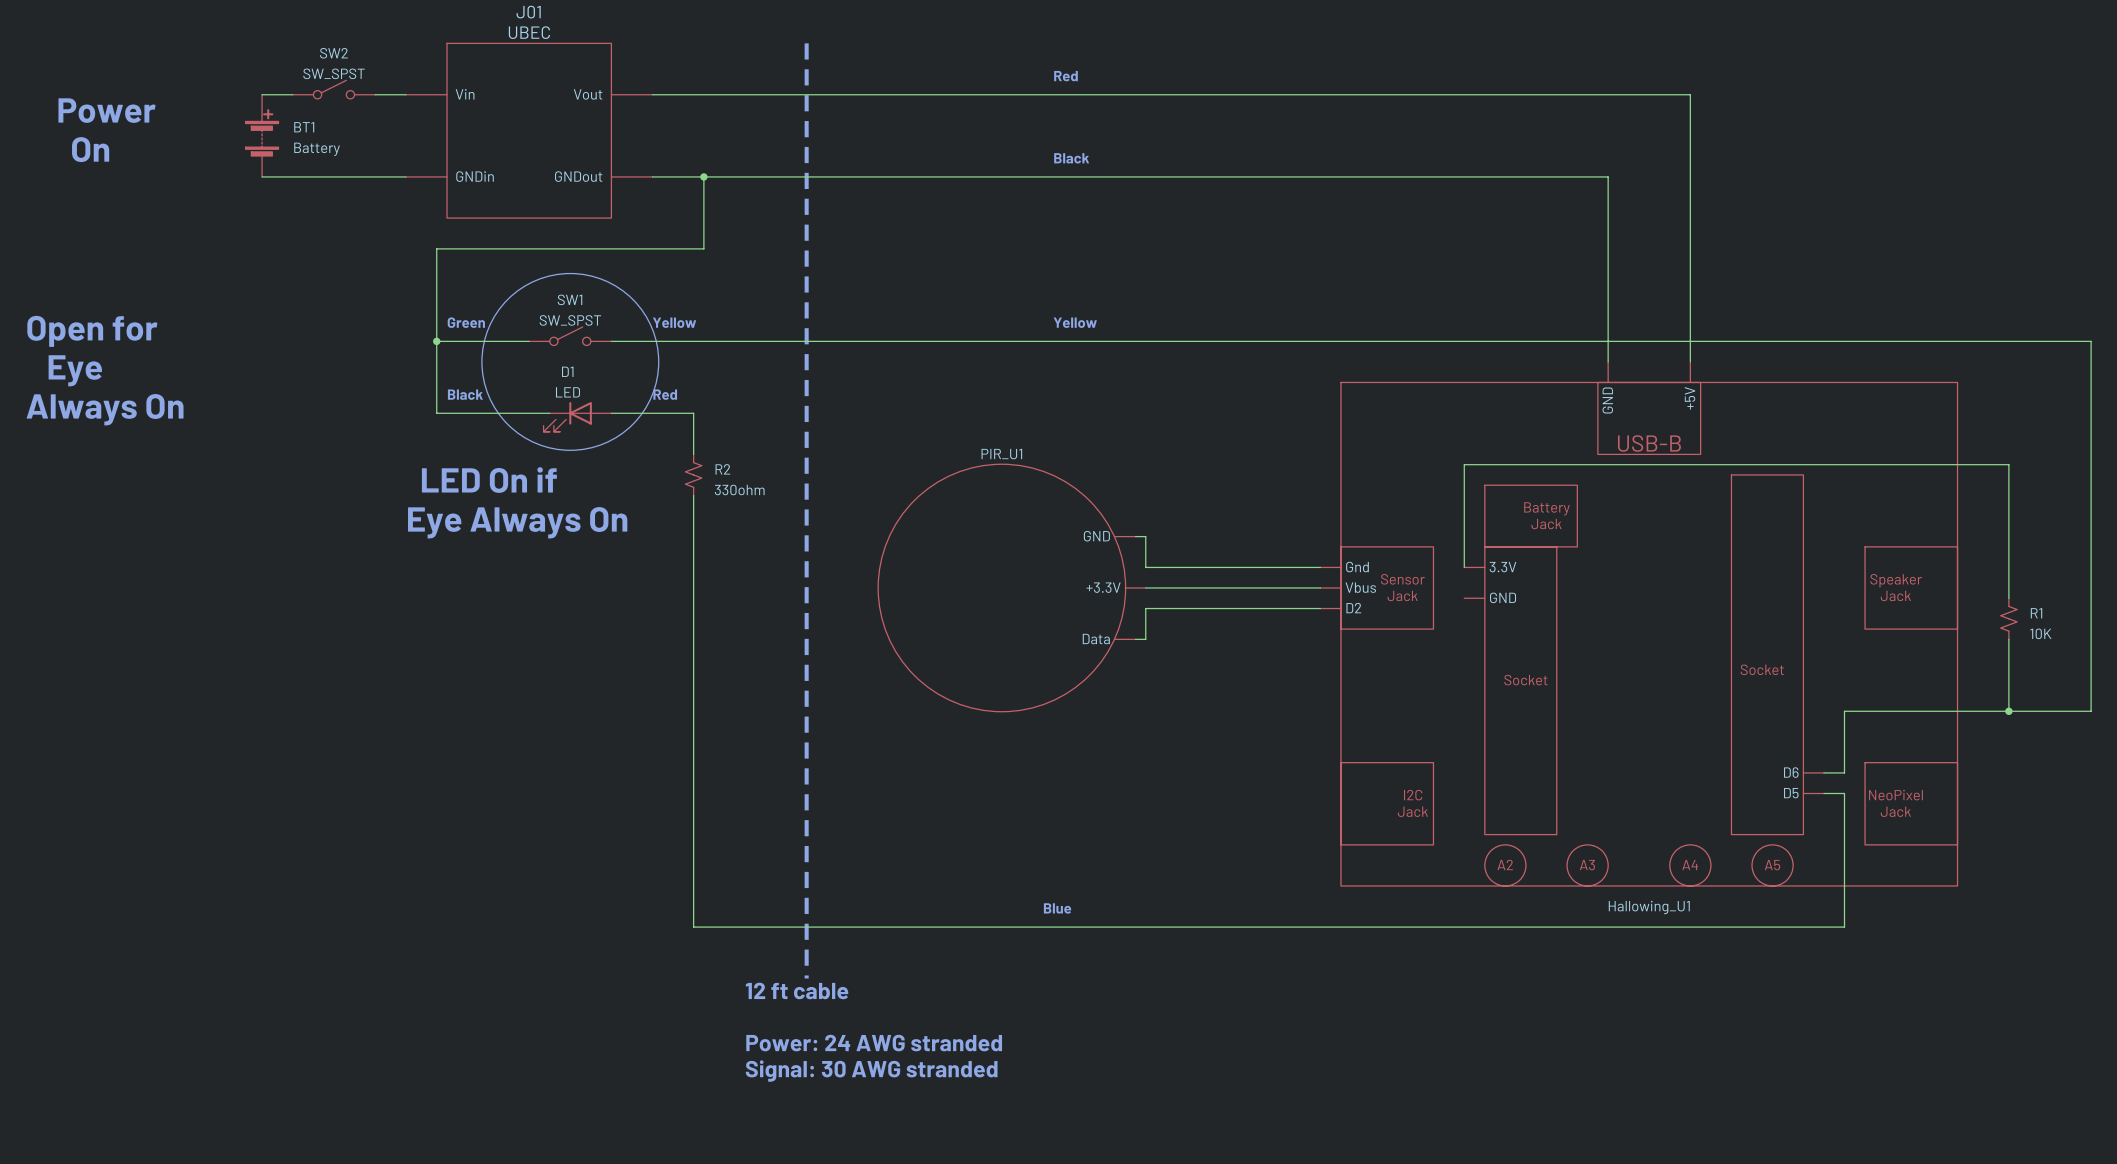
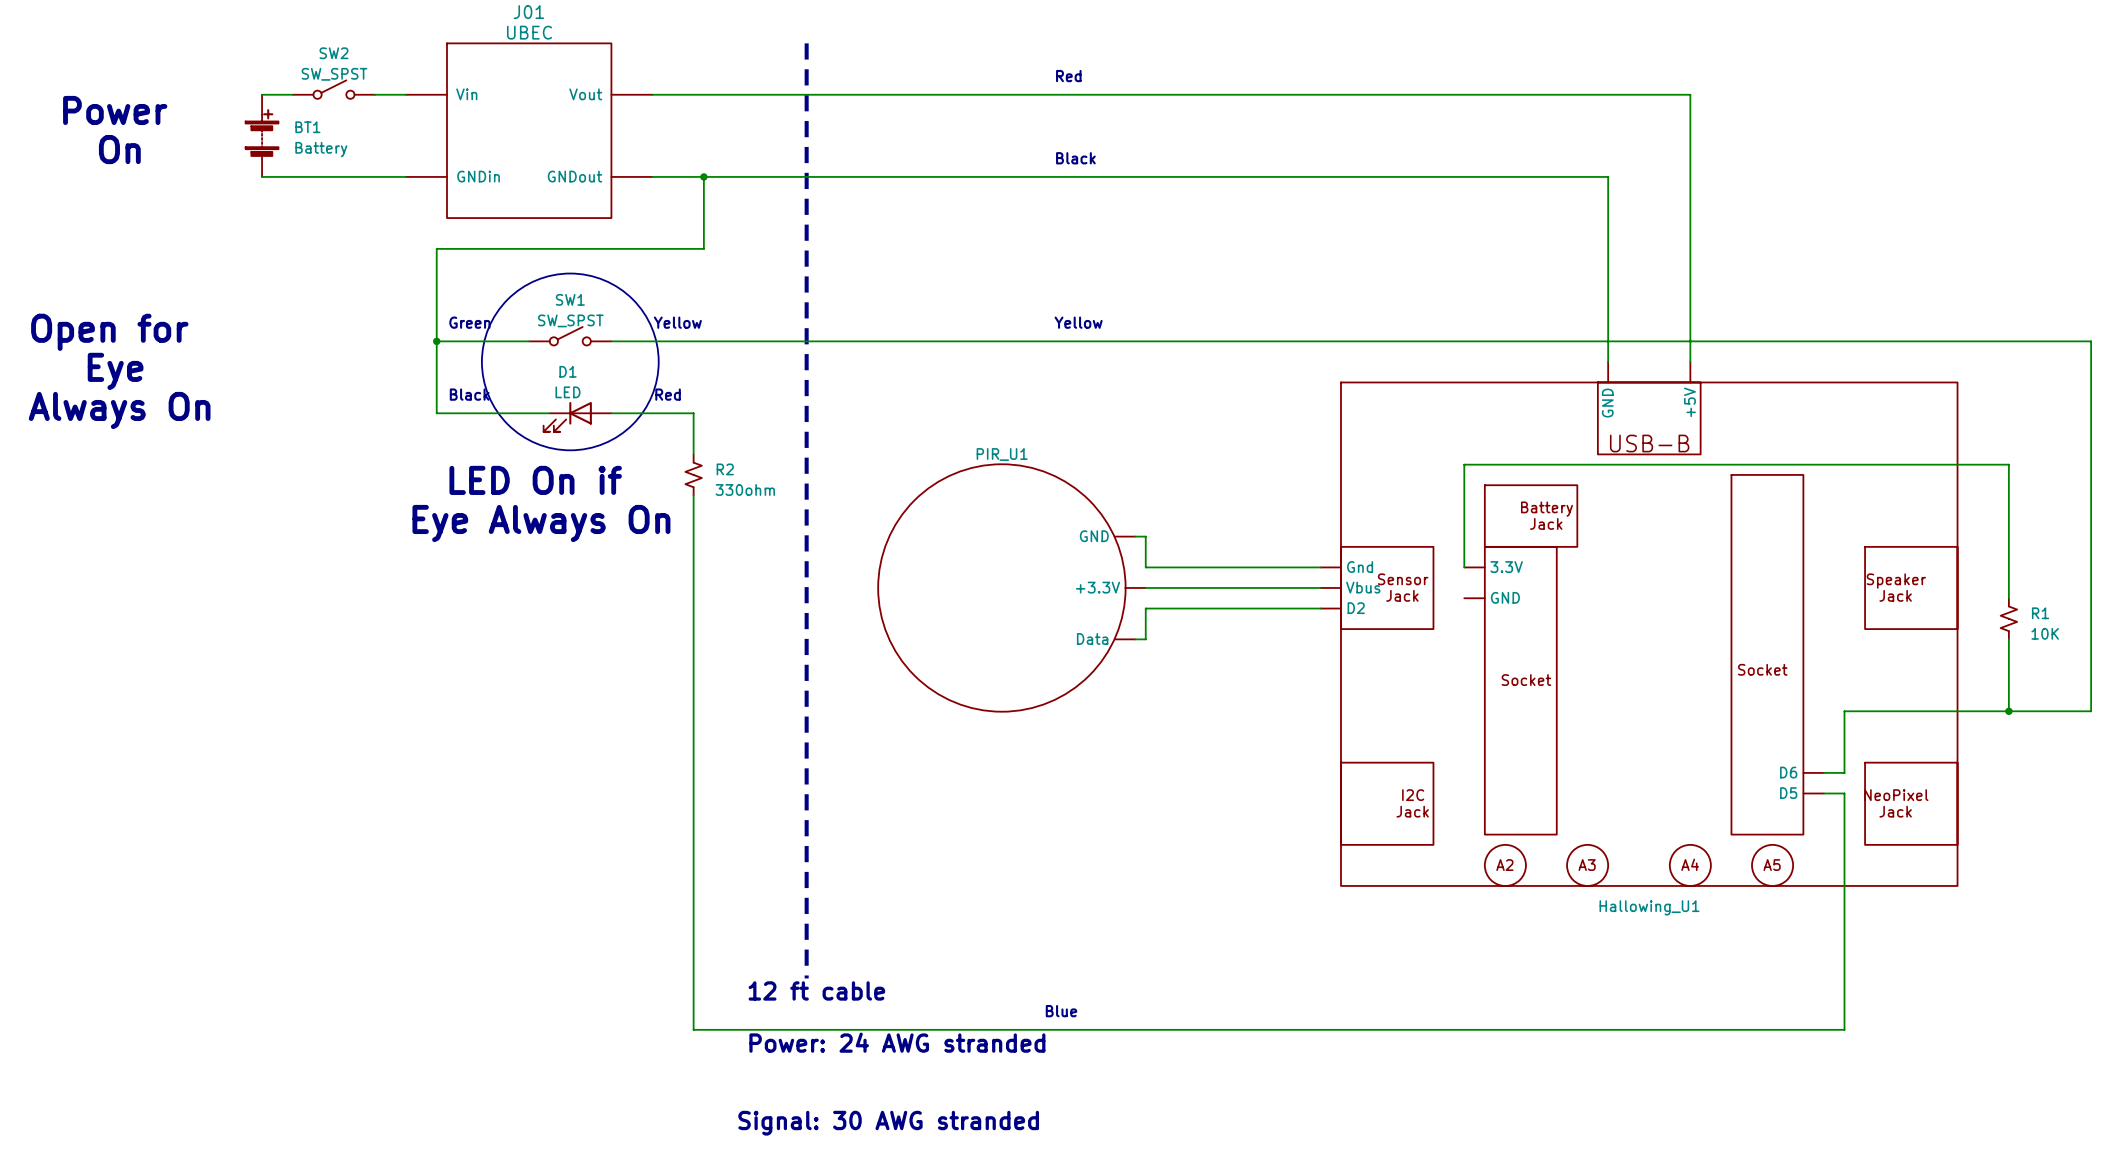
text position: Blue (1057, 908) -> Blue (1061, 1011)
wire: (693, 927) (1844, 927) -> (693, 927) (693, 1029) (1844, 1029) (1844, 927)
text position: Signal: 30 AWG stranded (871, 1071) -> Signal: 30 AWG stranded (888, 1123)

